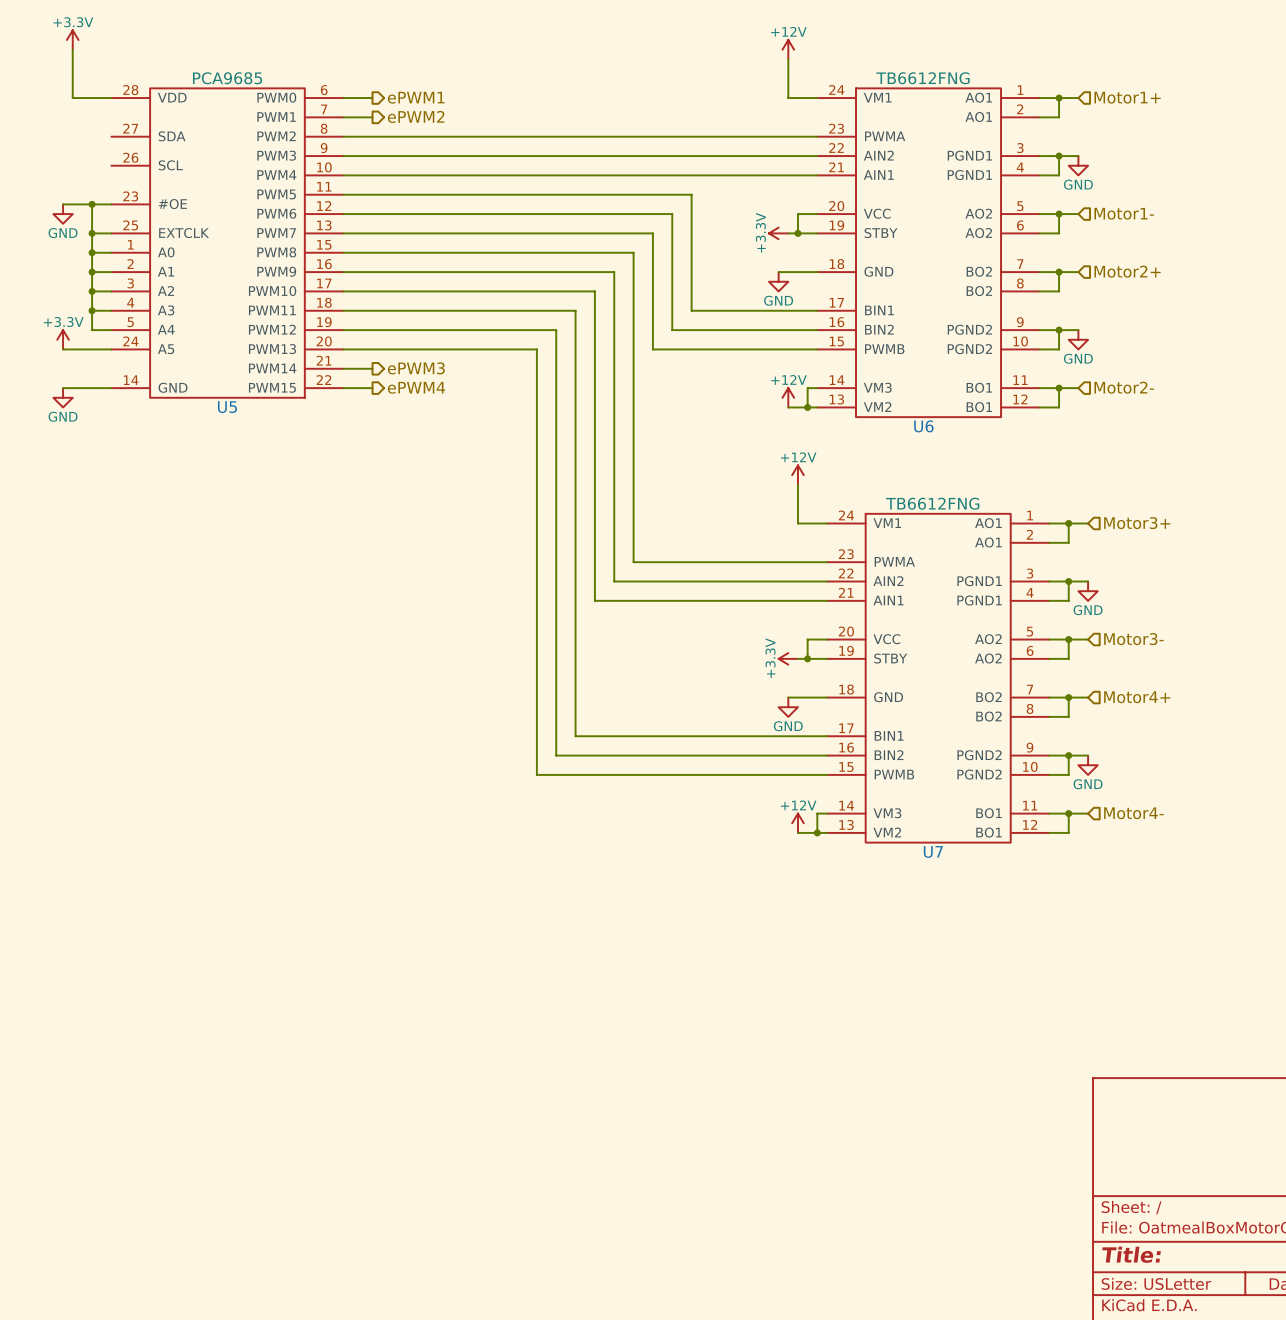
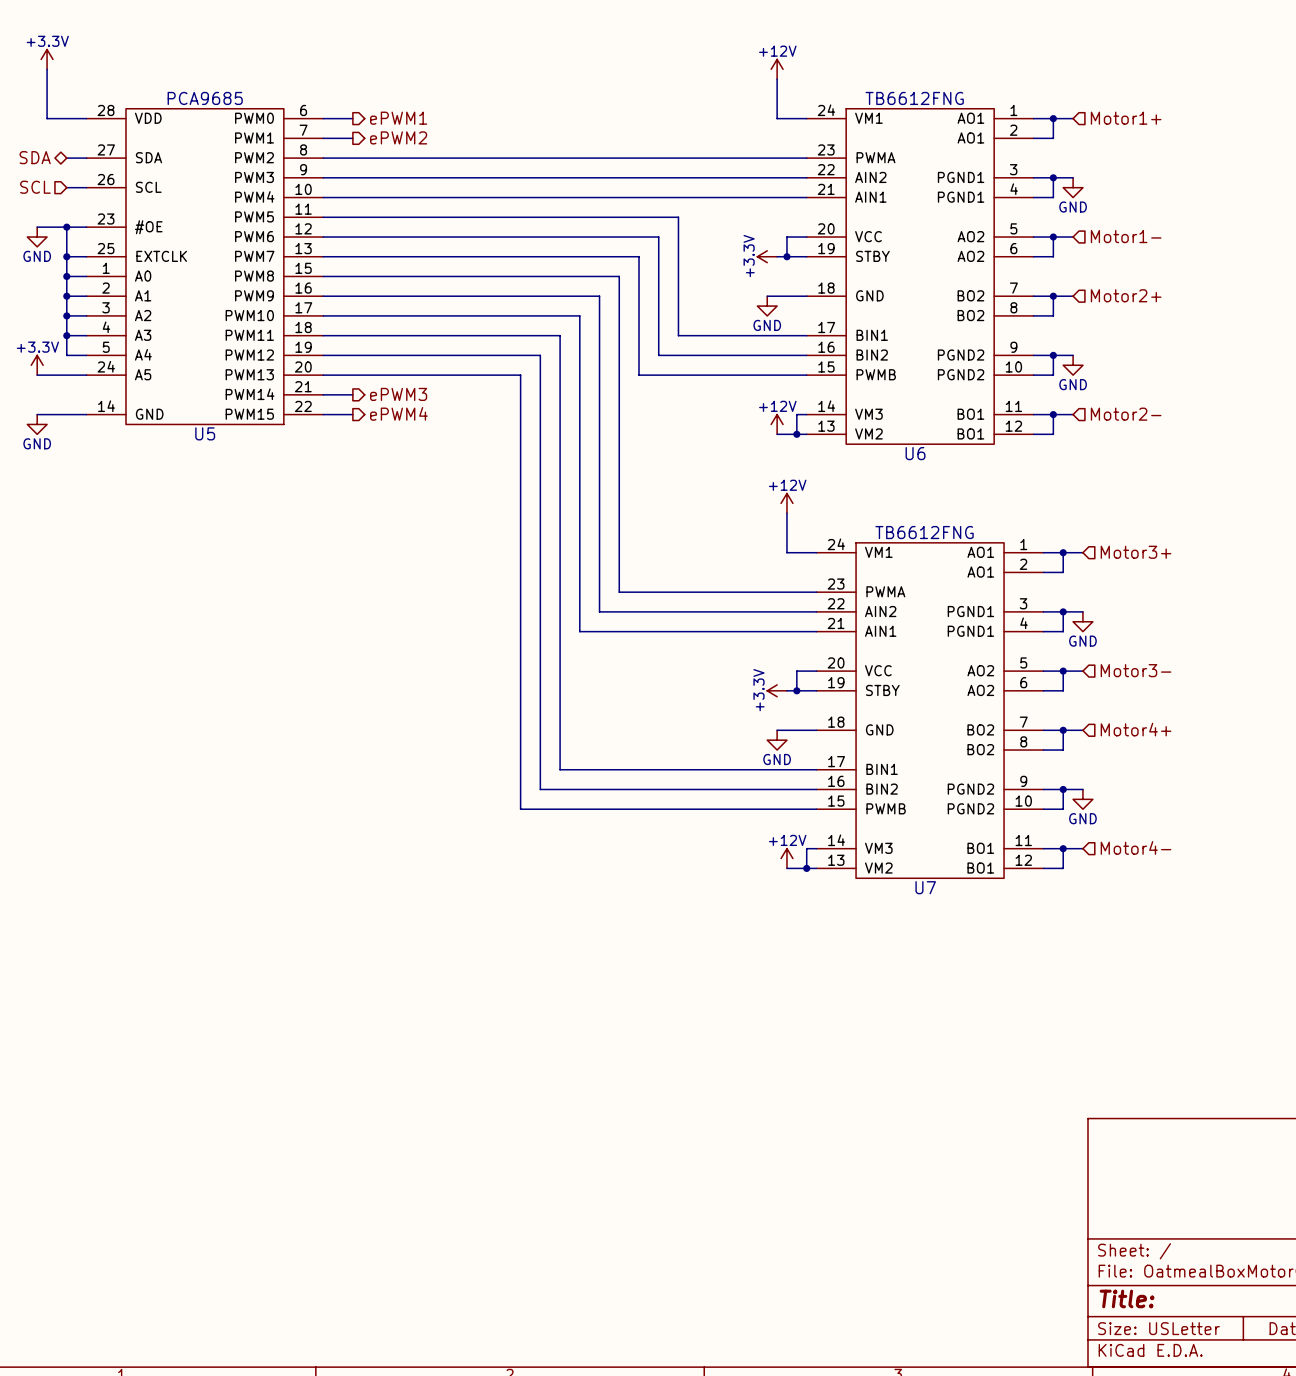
hierarchical label: none -> SDA (35, 157)
wire: none -> (66, 158) (86, 158)
hierarchical label: none -> SCL (35, 187)
wire: none -> (66, 187) (86, 187)

